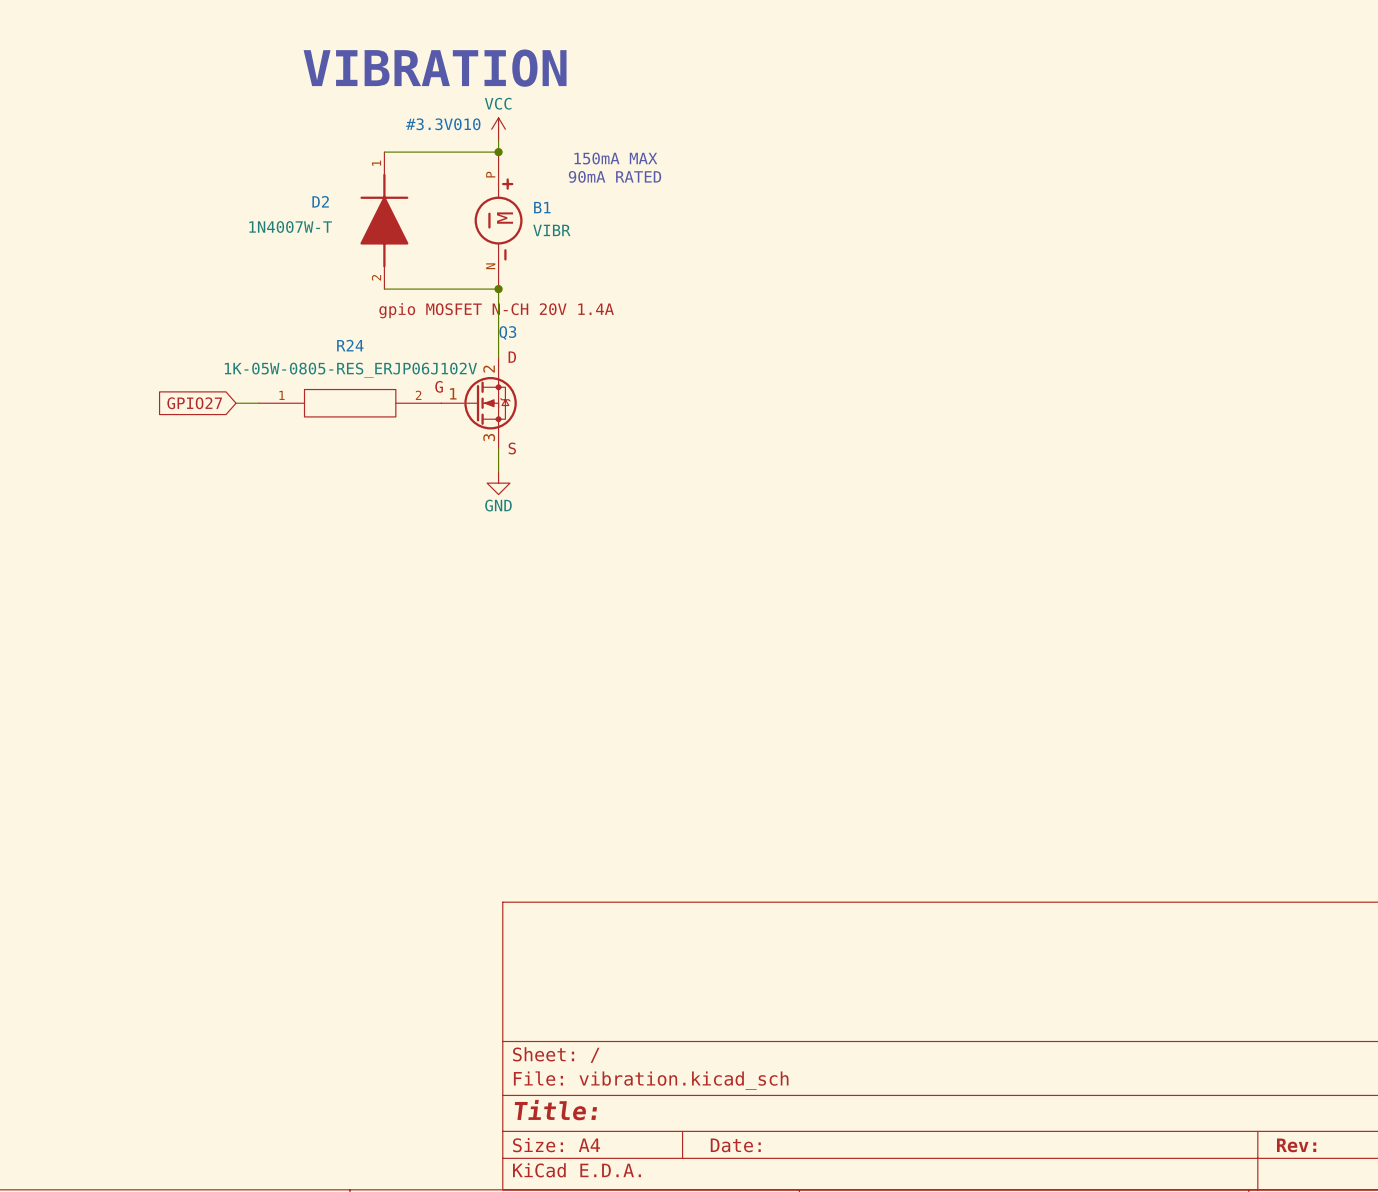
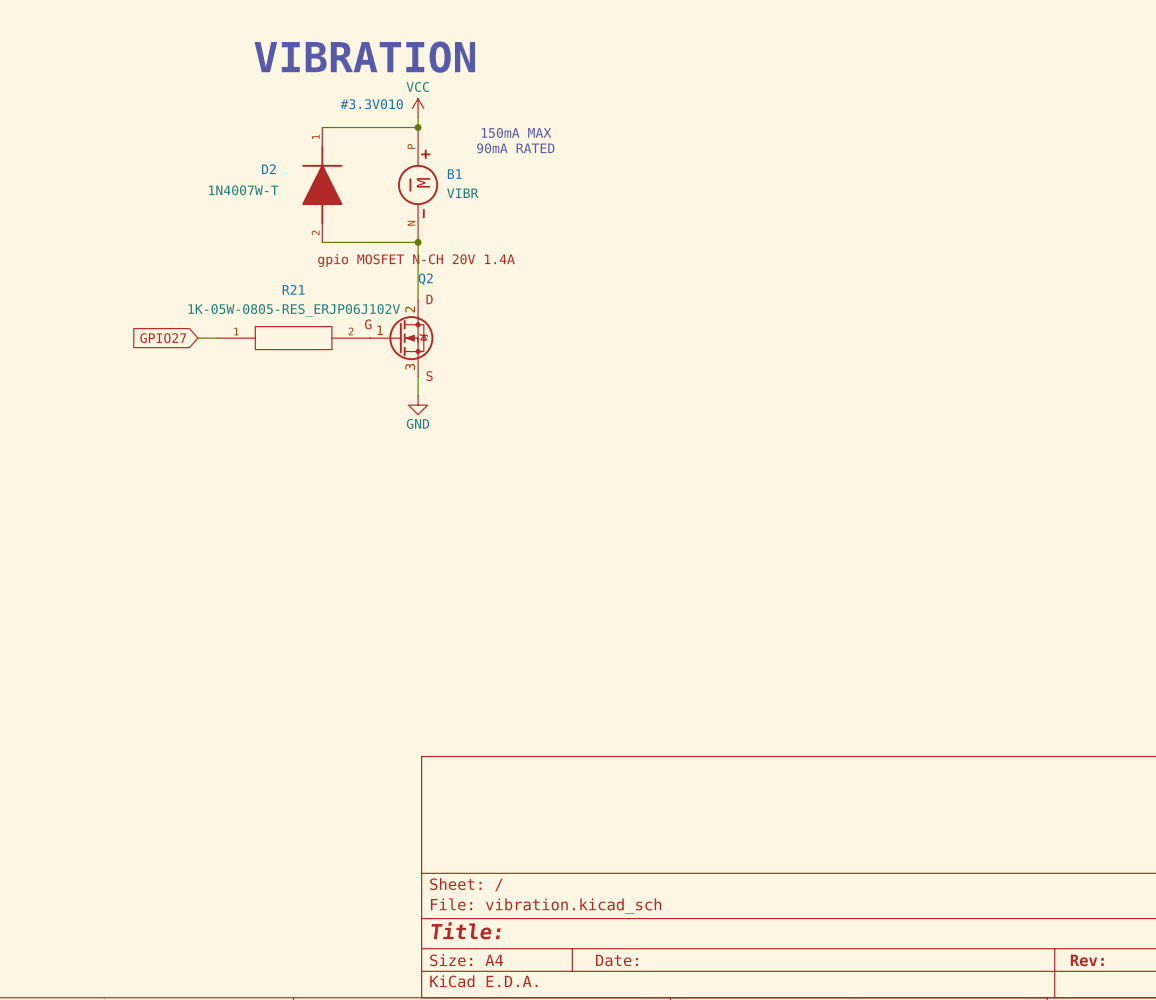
Q3 name: Q3 (507, 332) -> Q2 (425, 279)
R24 name: R24 (350, 345) -> R21 (293, 289)

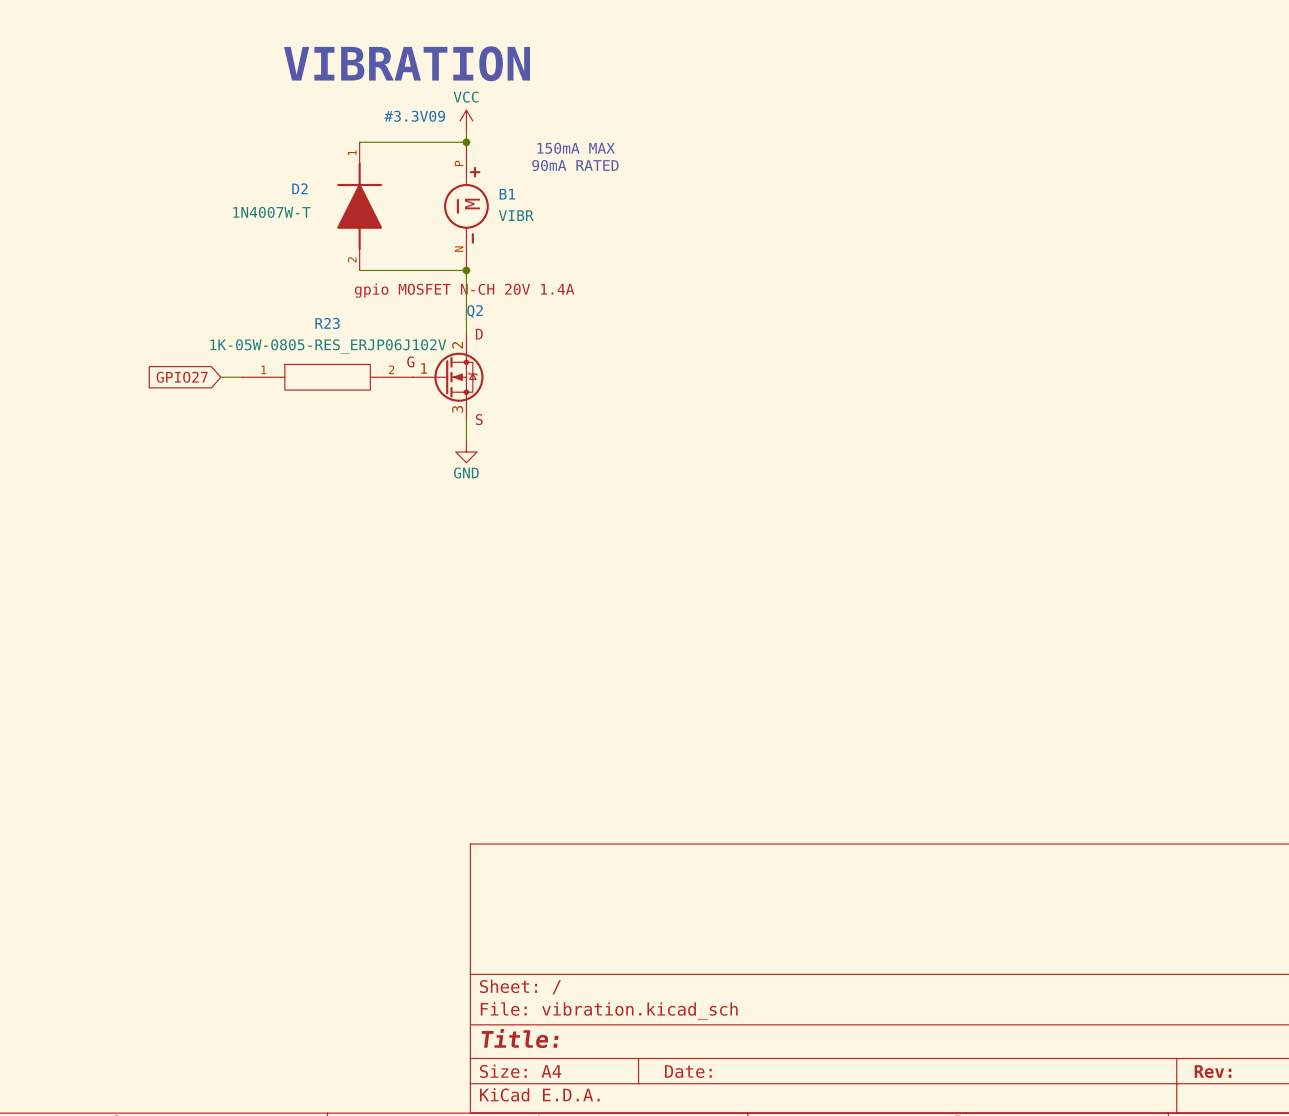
#3.3V010 name: #3.3V010 (371, 104) -> #3.3V09 (414, 116)
R21 name: R21 (293, 289) -> R23 (327, 323)

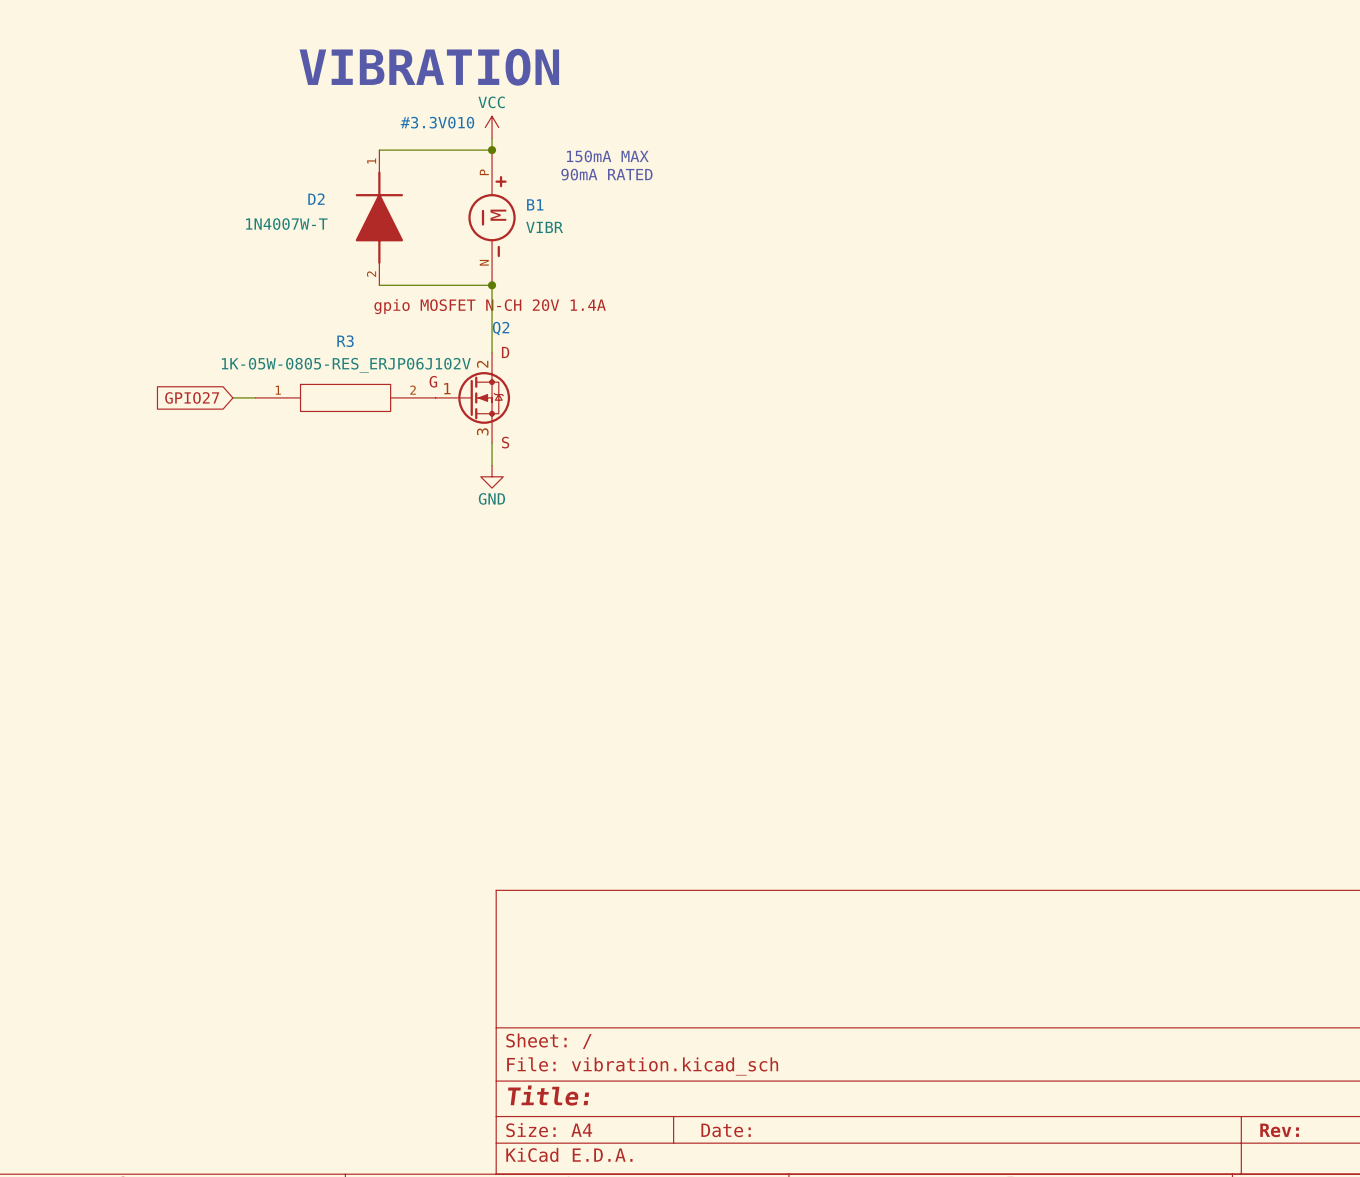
#3.3V09 name: #3.3V09 (414, 116) -> #3.3V010 (437, 122)
R23 name: R23 (327, 323) -> R3 (345, 341)

